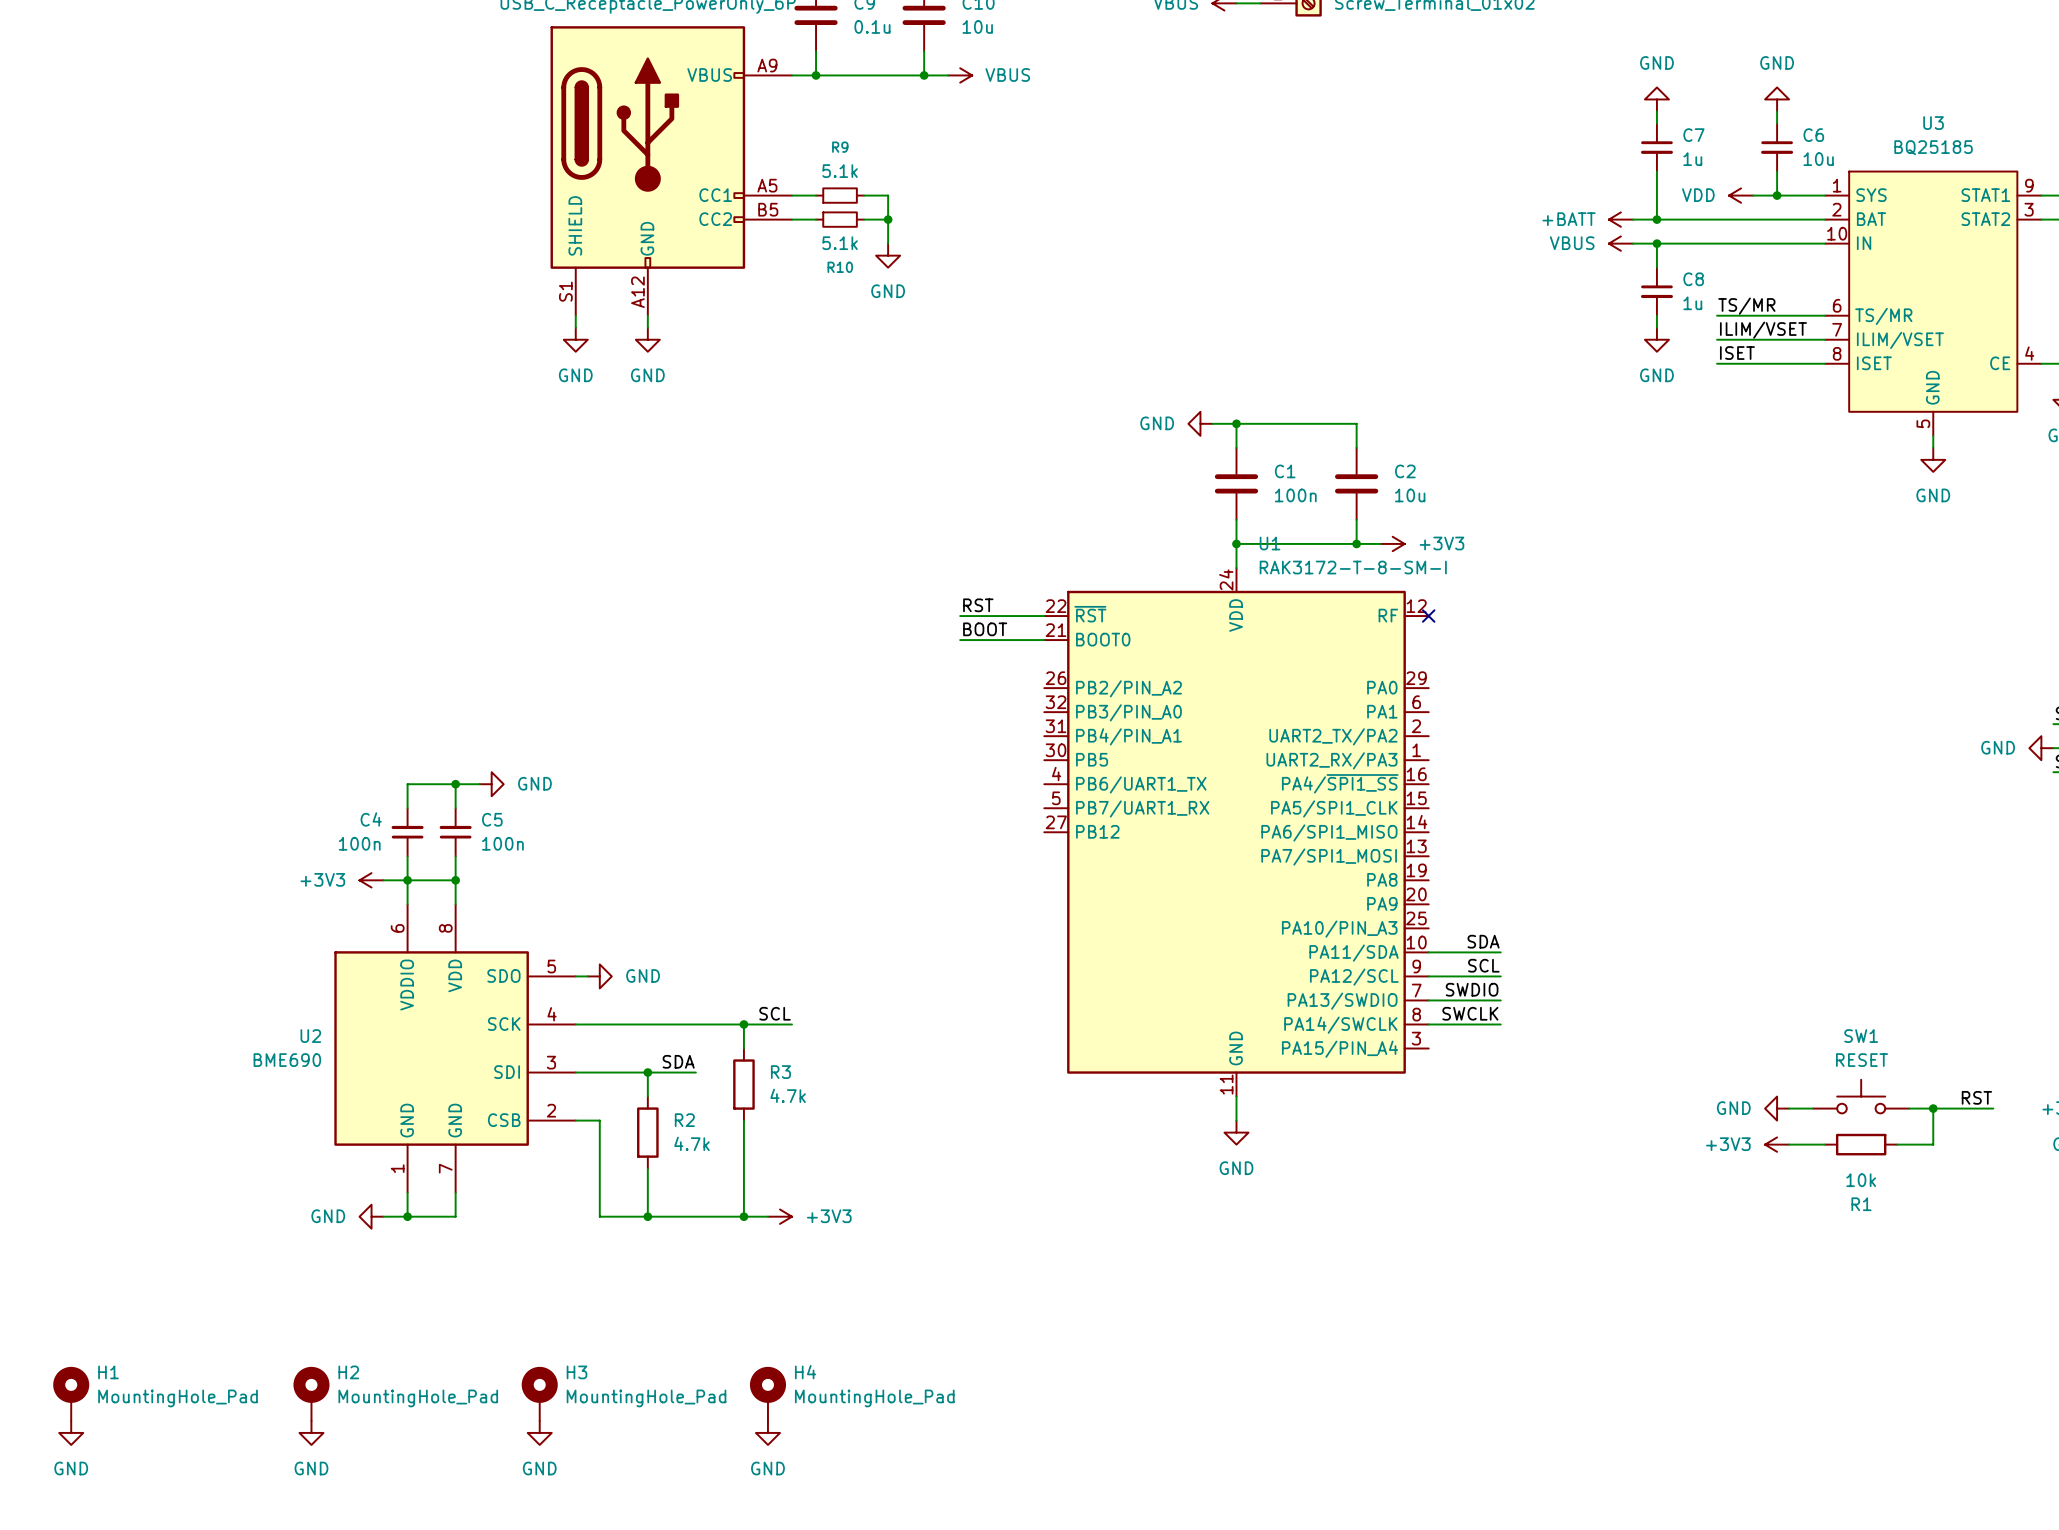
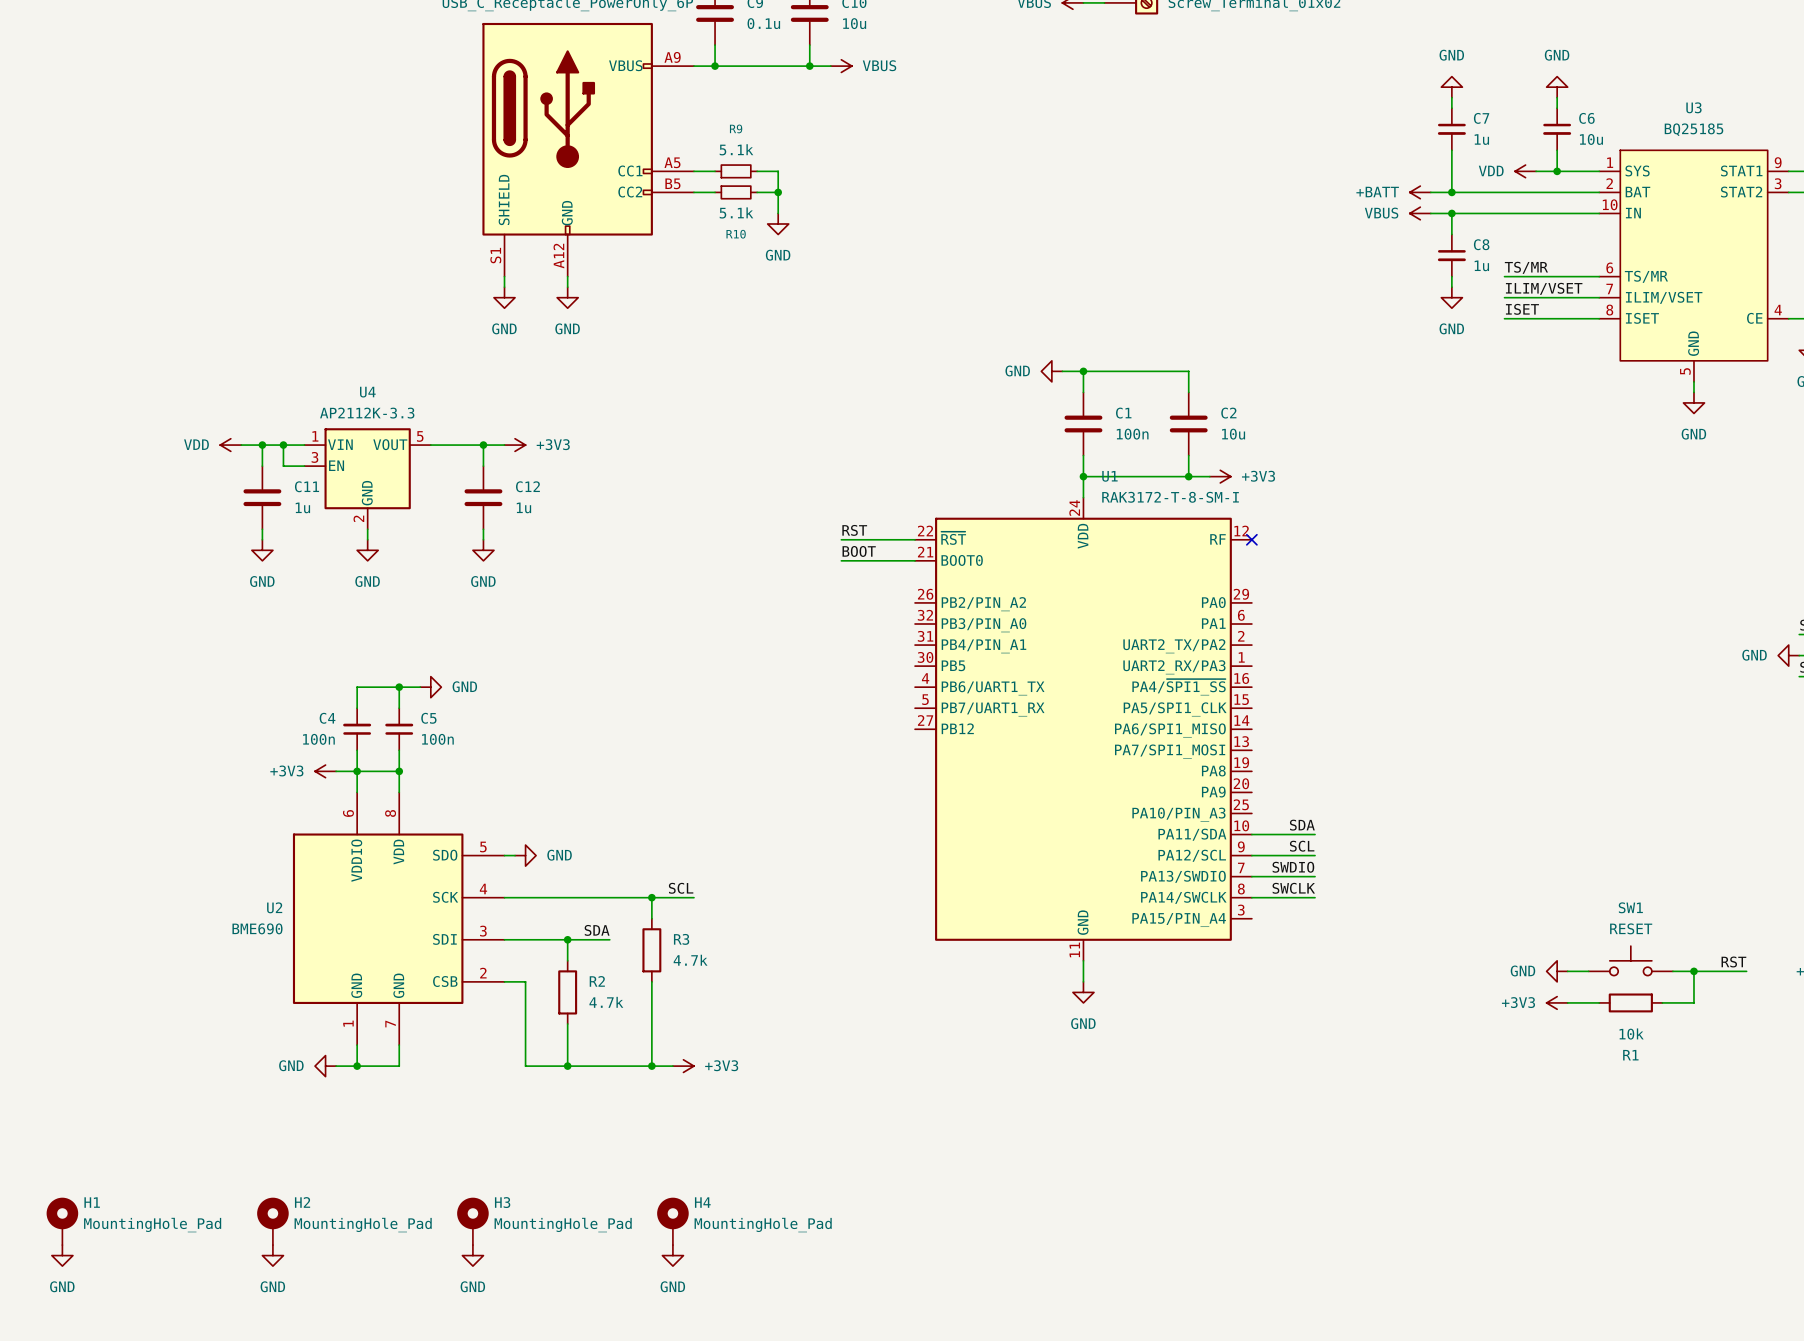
power symbol: none -> VDD (230, 445)
wire: none -> (241, 445) (304, 445)
wire: none -> (262, 445) (262, 466)
junction: none -> (262, 445)
wire: none -> (283, 445) (283, 466) (304, 466)
junction: none -> (283, 445)
wire: none -> (430, 445) (504, 445)
wire: none -> (483, 445) (483, 466)
junction: none -> (483, 445)
power symbol: none -> +3V3 (515, 445)
U4: none -> AP2112K-3.3 (367, 478)
C11: none -> 1u (262, 497)
C12: none -> 1u (483, 497)
wire: none -> (262, 529) (262, 539)
wire: none -> (367, 529) (367, 539)
wire: none -> (483, 529) (483, 539)
power symbol: none -> GND (262, 550)
power symbol: none -> GND (367, 550)
power symbol: none -> GND (483, 550)

